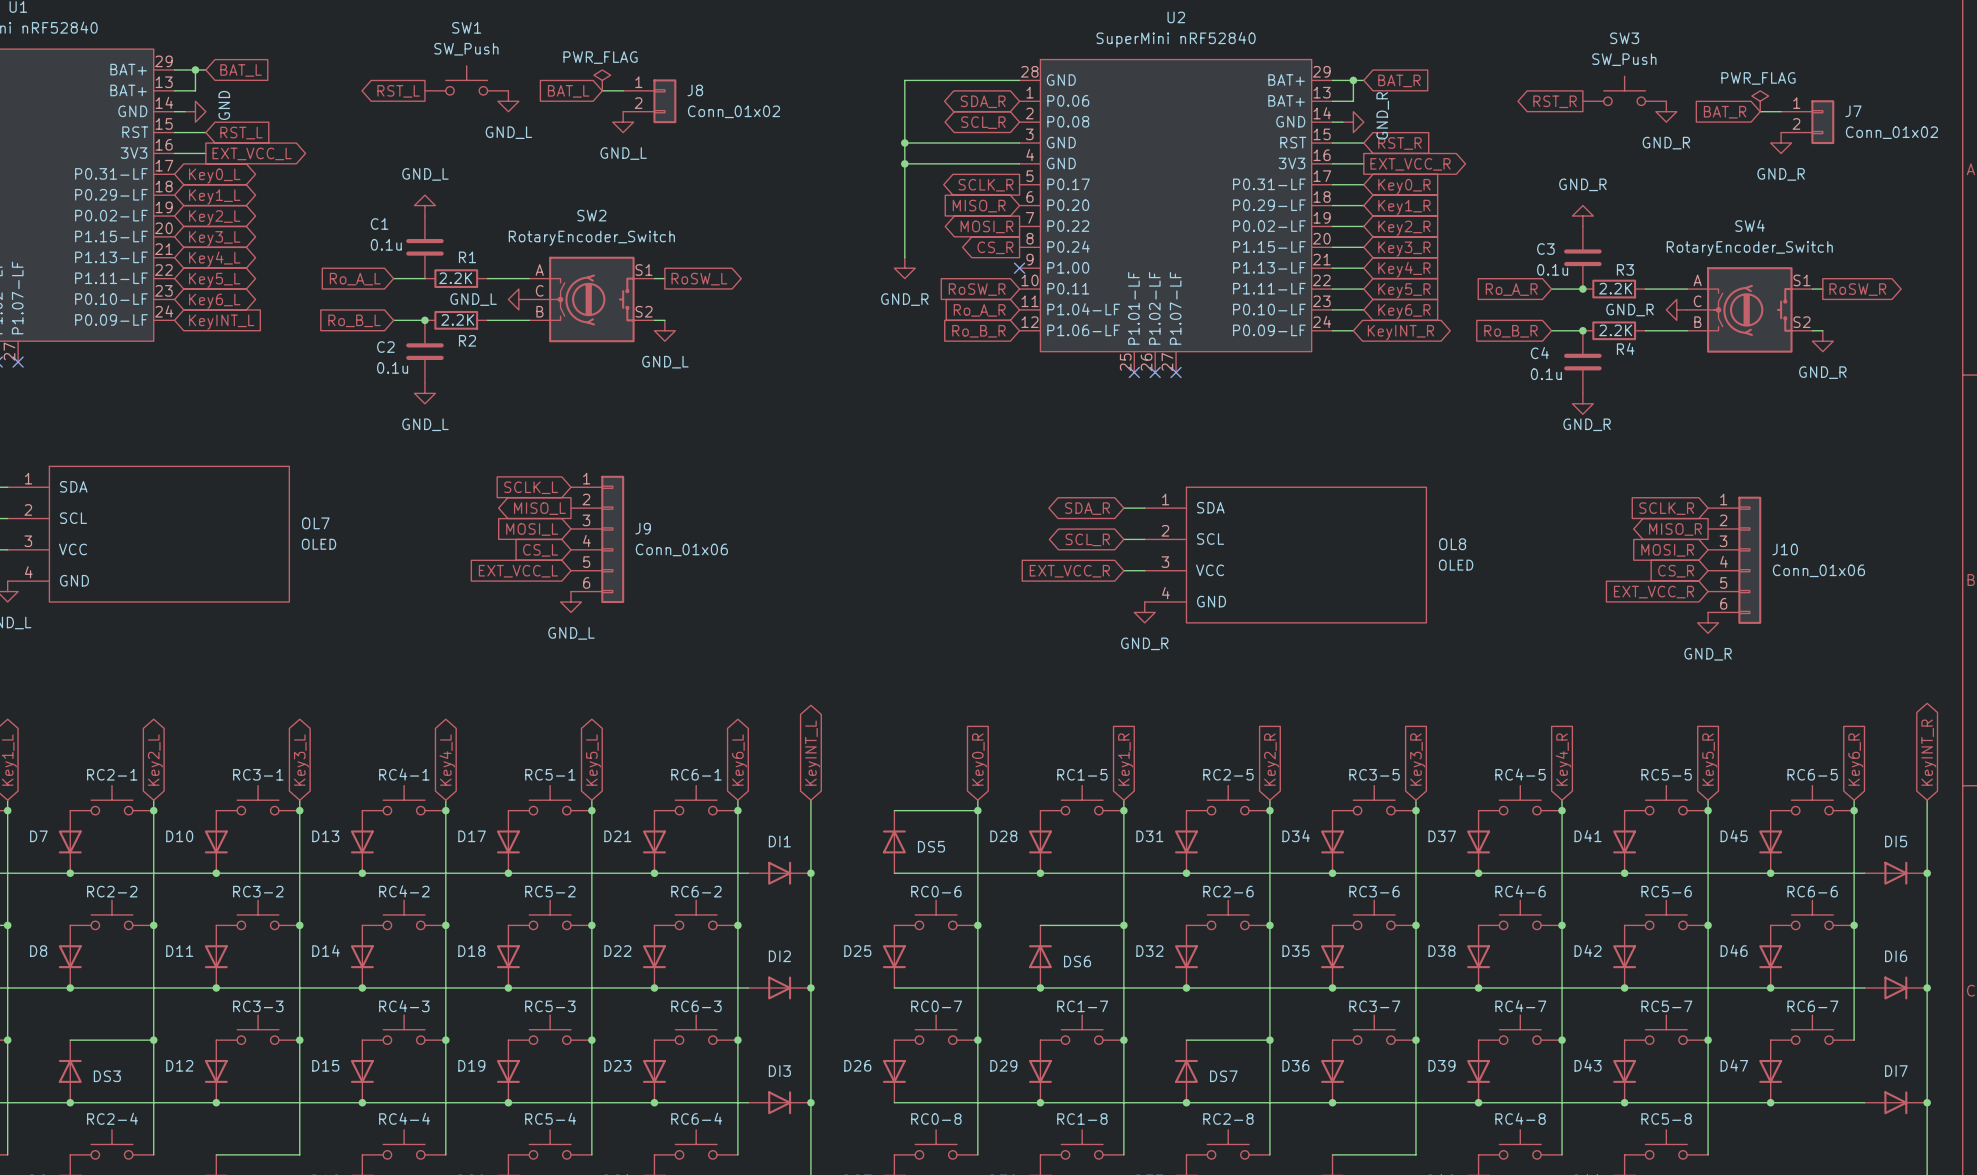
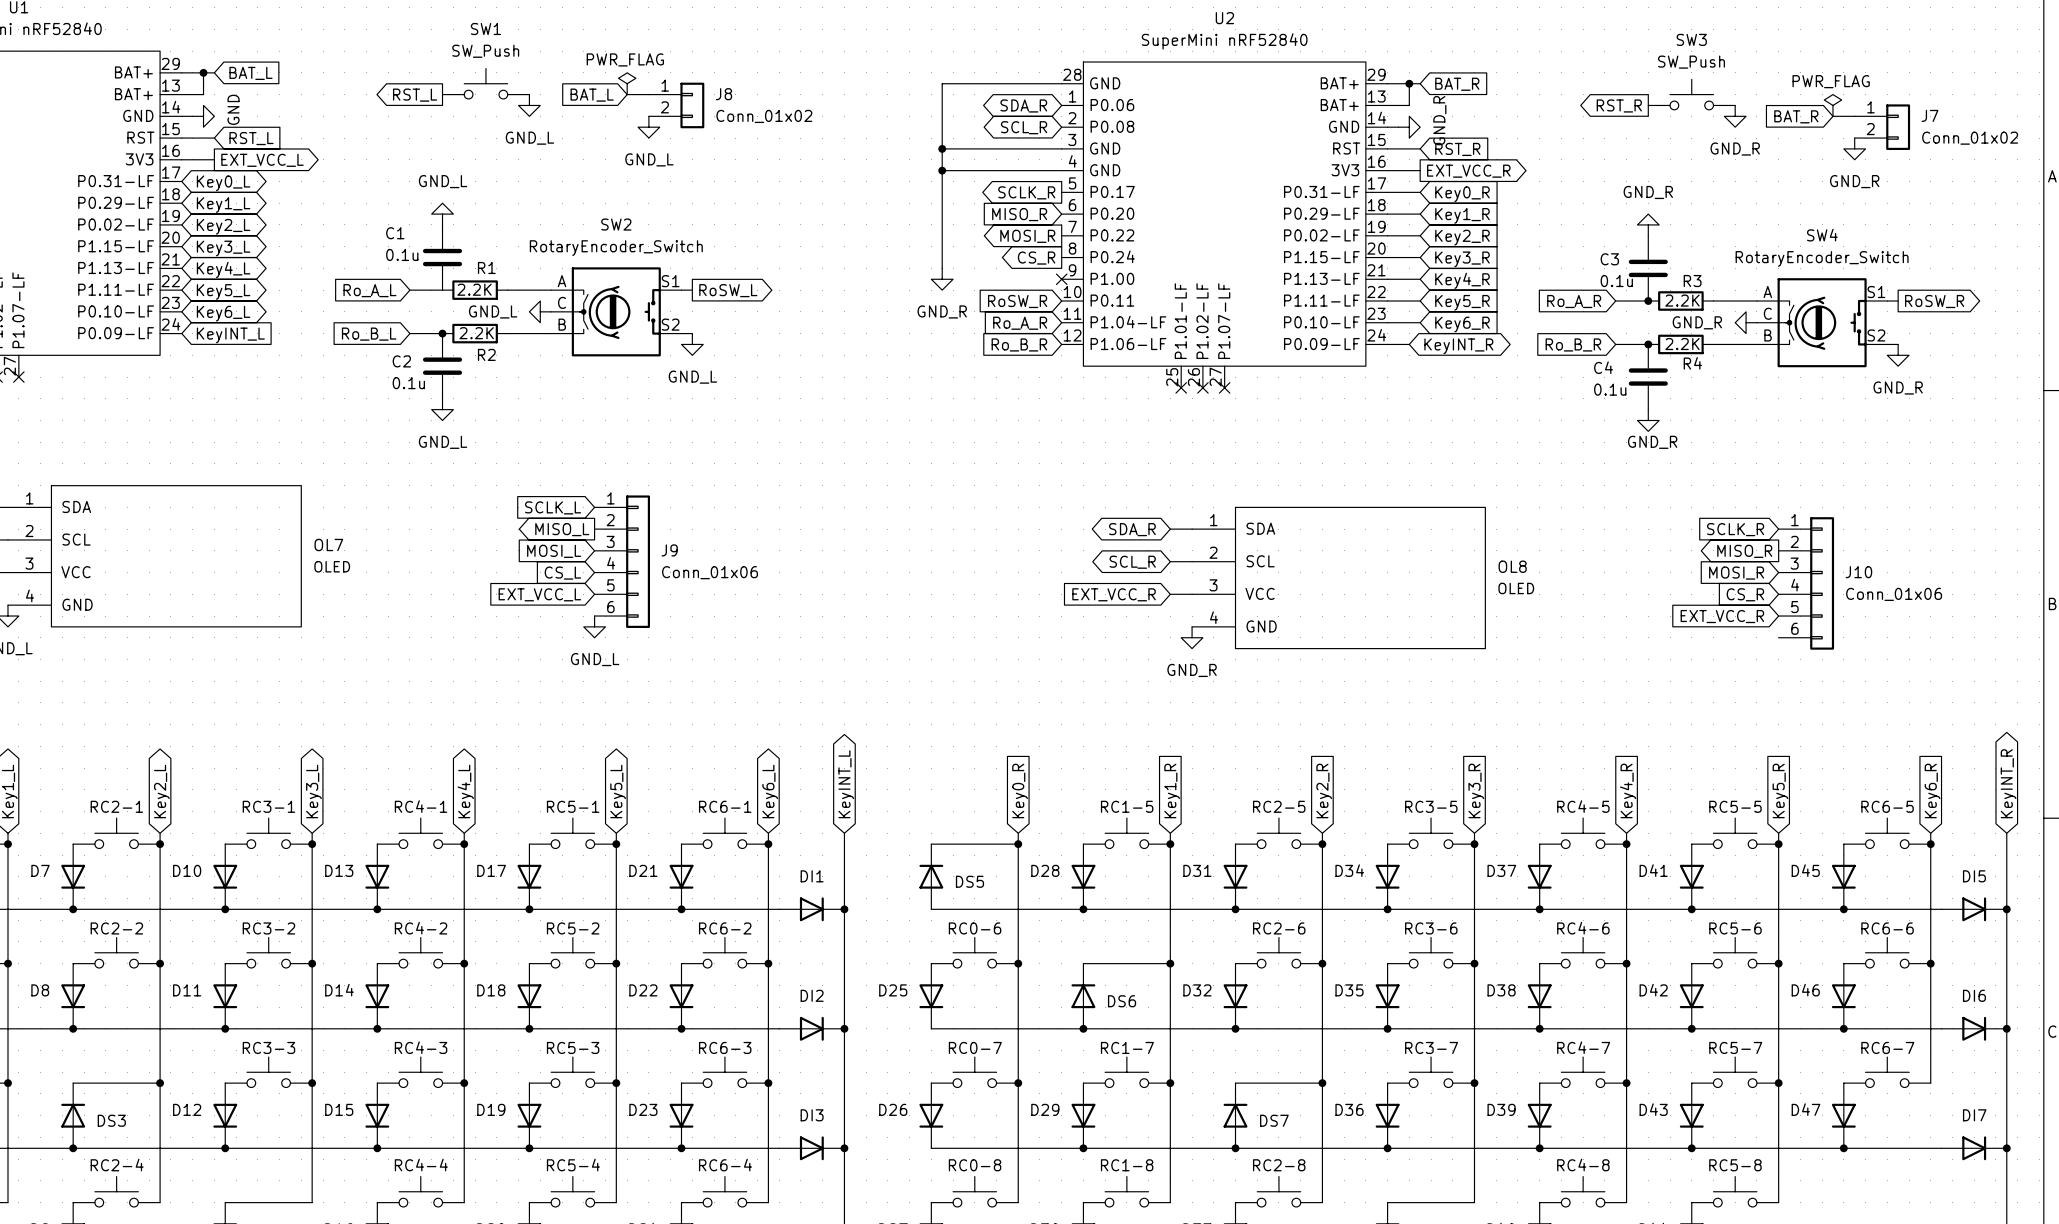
power symbol: GND_R (1708, 622) -> none

